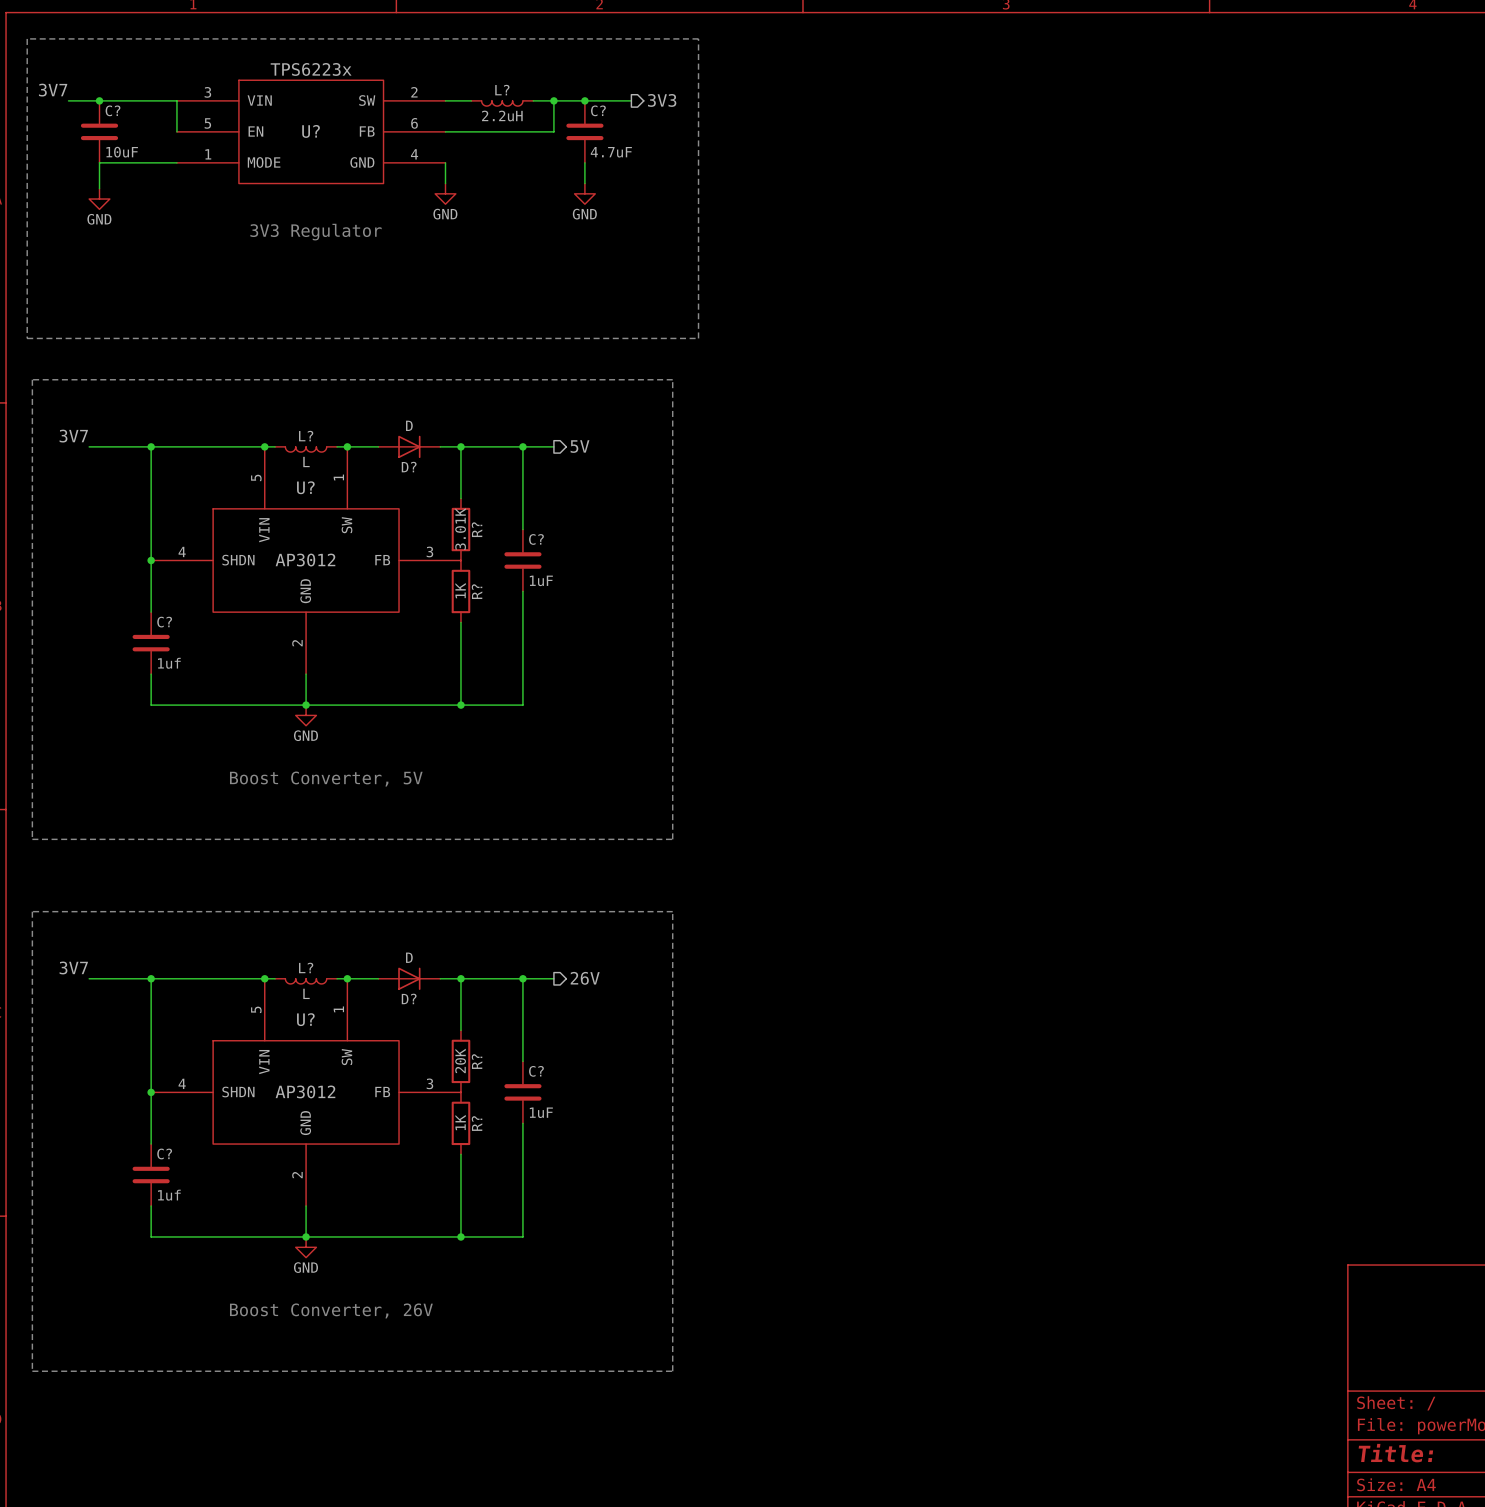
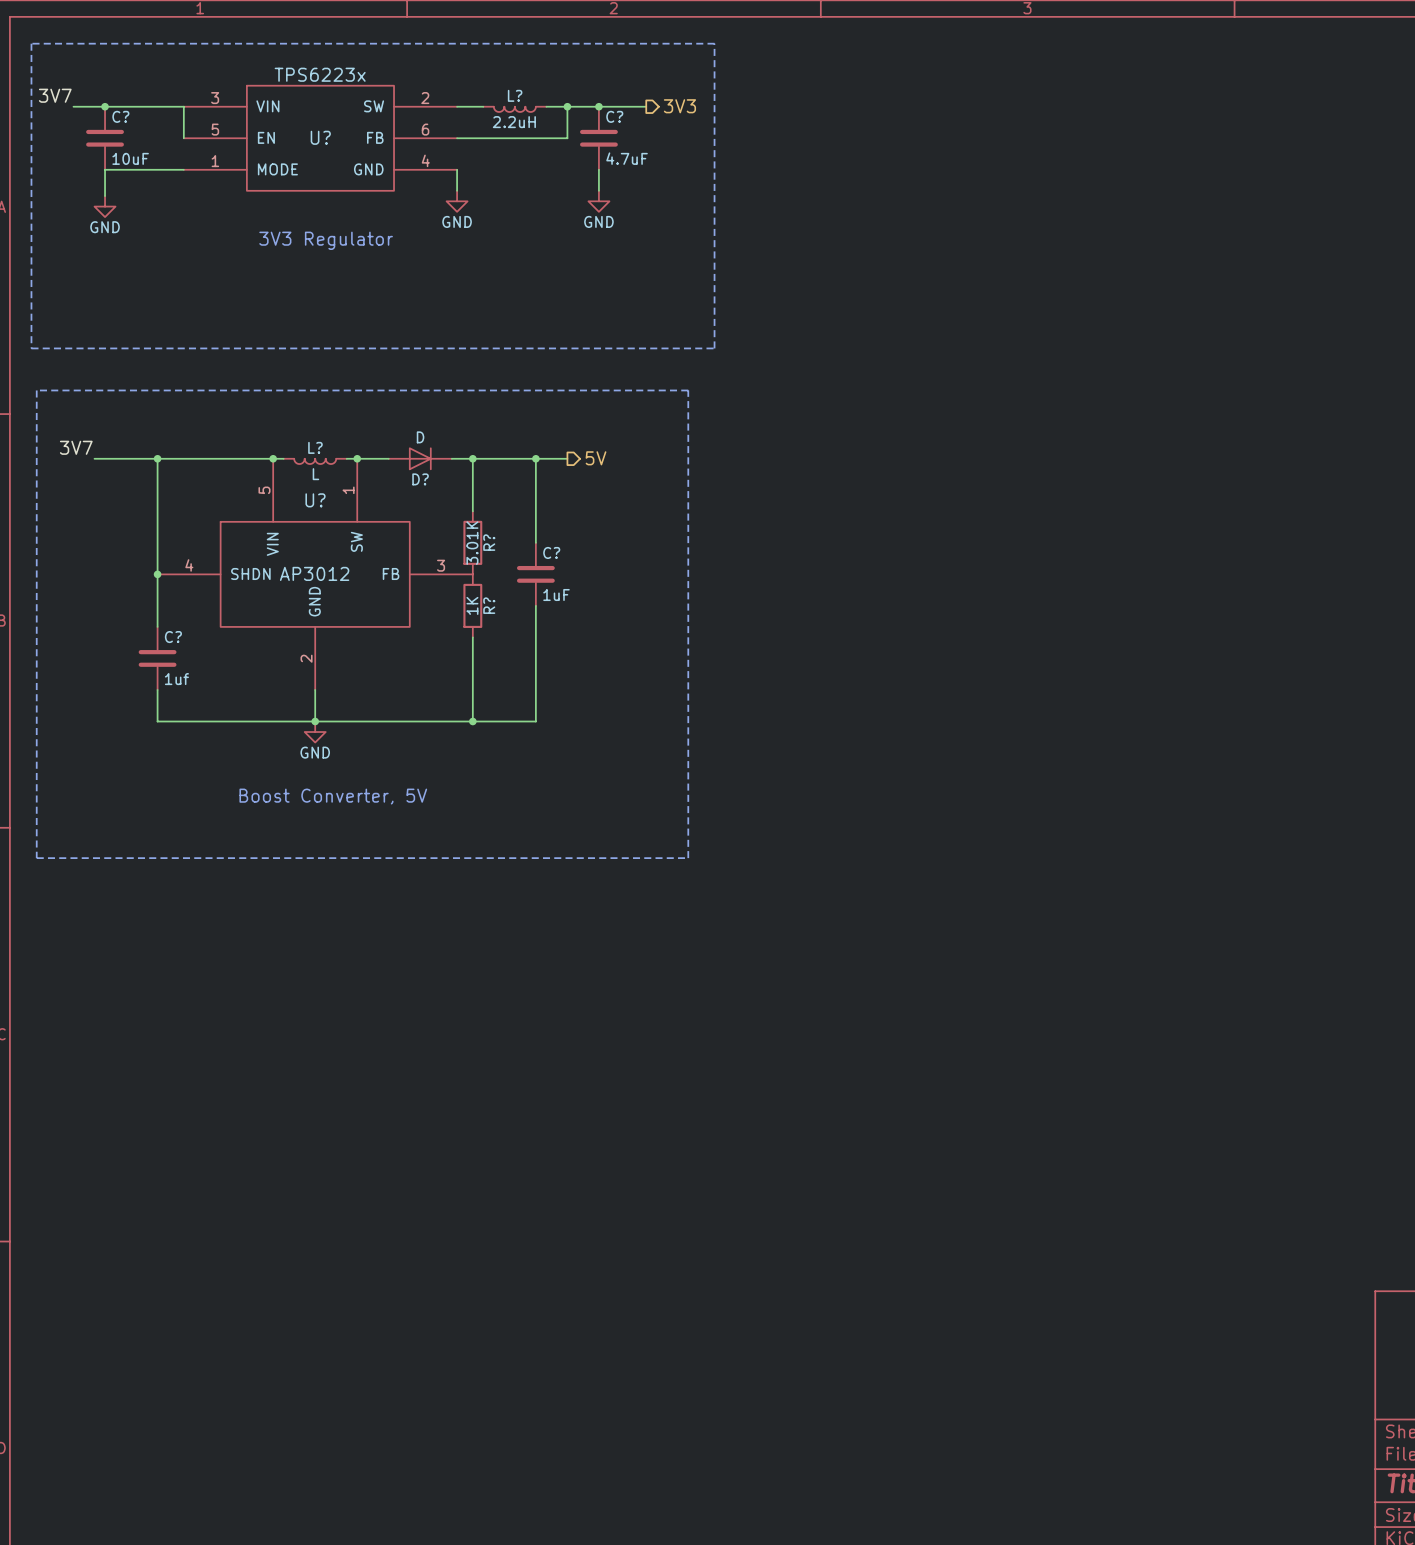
line: (32, 911) (672, 911) (672, 1371) (32, 1371) (32, 911) -> none
label: 3V7 (73, 967) -> none
wire: (89, 978) (275, 978) -> none
wire: (151, 978) (151, 1144) -> none
junction: (151, 978) -> none
junction: (264, 978) -> none
wire: (337, 978) (378, 978) -> none
junction: (347, 978) -> none
D?: D (409, 978) -> none
wire: (440, 978) (553, 978) -> none
wire: (460, 978) (460, 1030) -> none
junction: (460, 978) -> none
wire: (522, 978) (522, 1061) -> none
junction: (522, 978) -> none
hierarchical label: 26V (585, 978) -> none
L?: L (306, 981) -> none
R?: 20K (460, 1061) -> none
junction: (151, 1092) -> none
U?: AP3012 (306, 1092) -> none
C?: 1uF (522, 1092) -> none
R?: 1K (460, 1123) -> none
wire: (522, 1123) (522, 1236) (151, 1236) (151, 1206) -> none
wire: (460, 1154) (460, 1236) -> none
C?: 1uf (151, 1175) -> none
wire: (306, 1206) (306, 1236) -> none
junction: (306, 1236) -> none
junction: (460, 1236) -> none
power symbol: GND (306, 1247) -> none
text: Boost Converter, 26V (331, 1310) -> none

